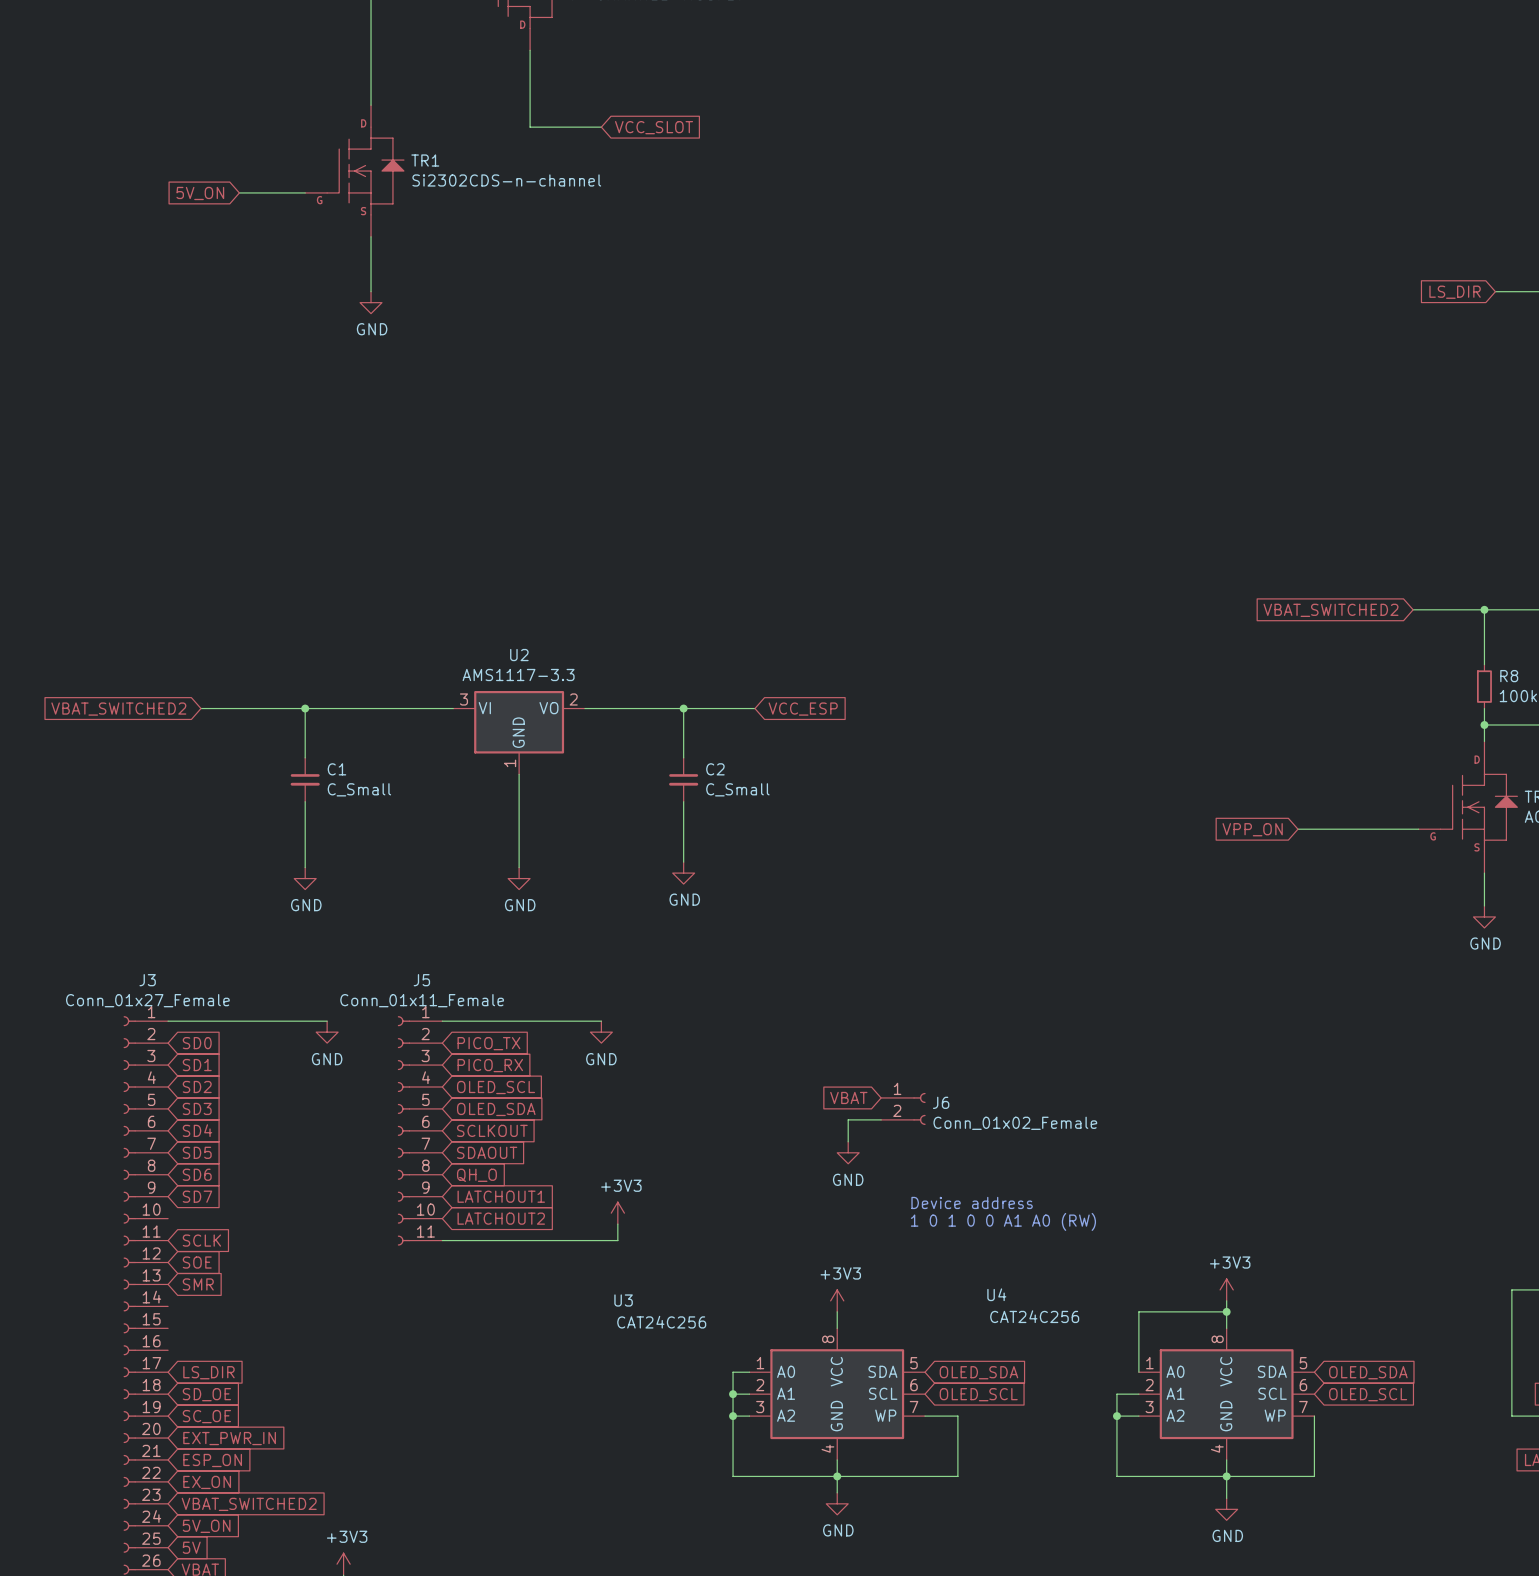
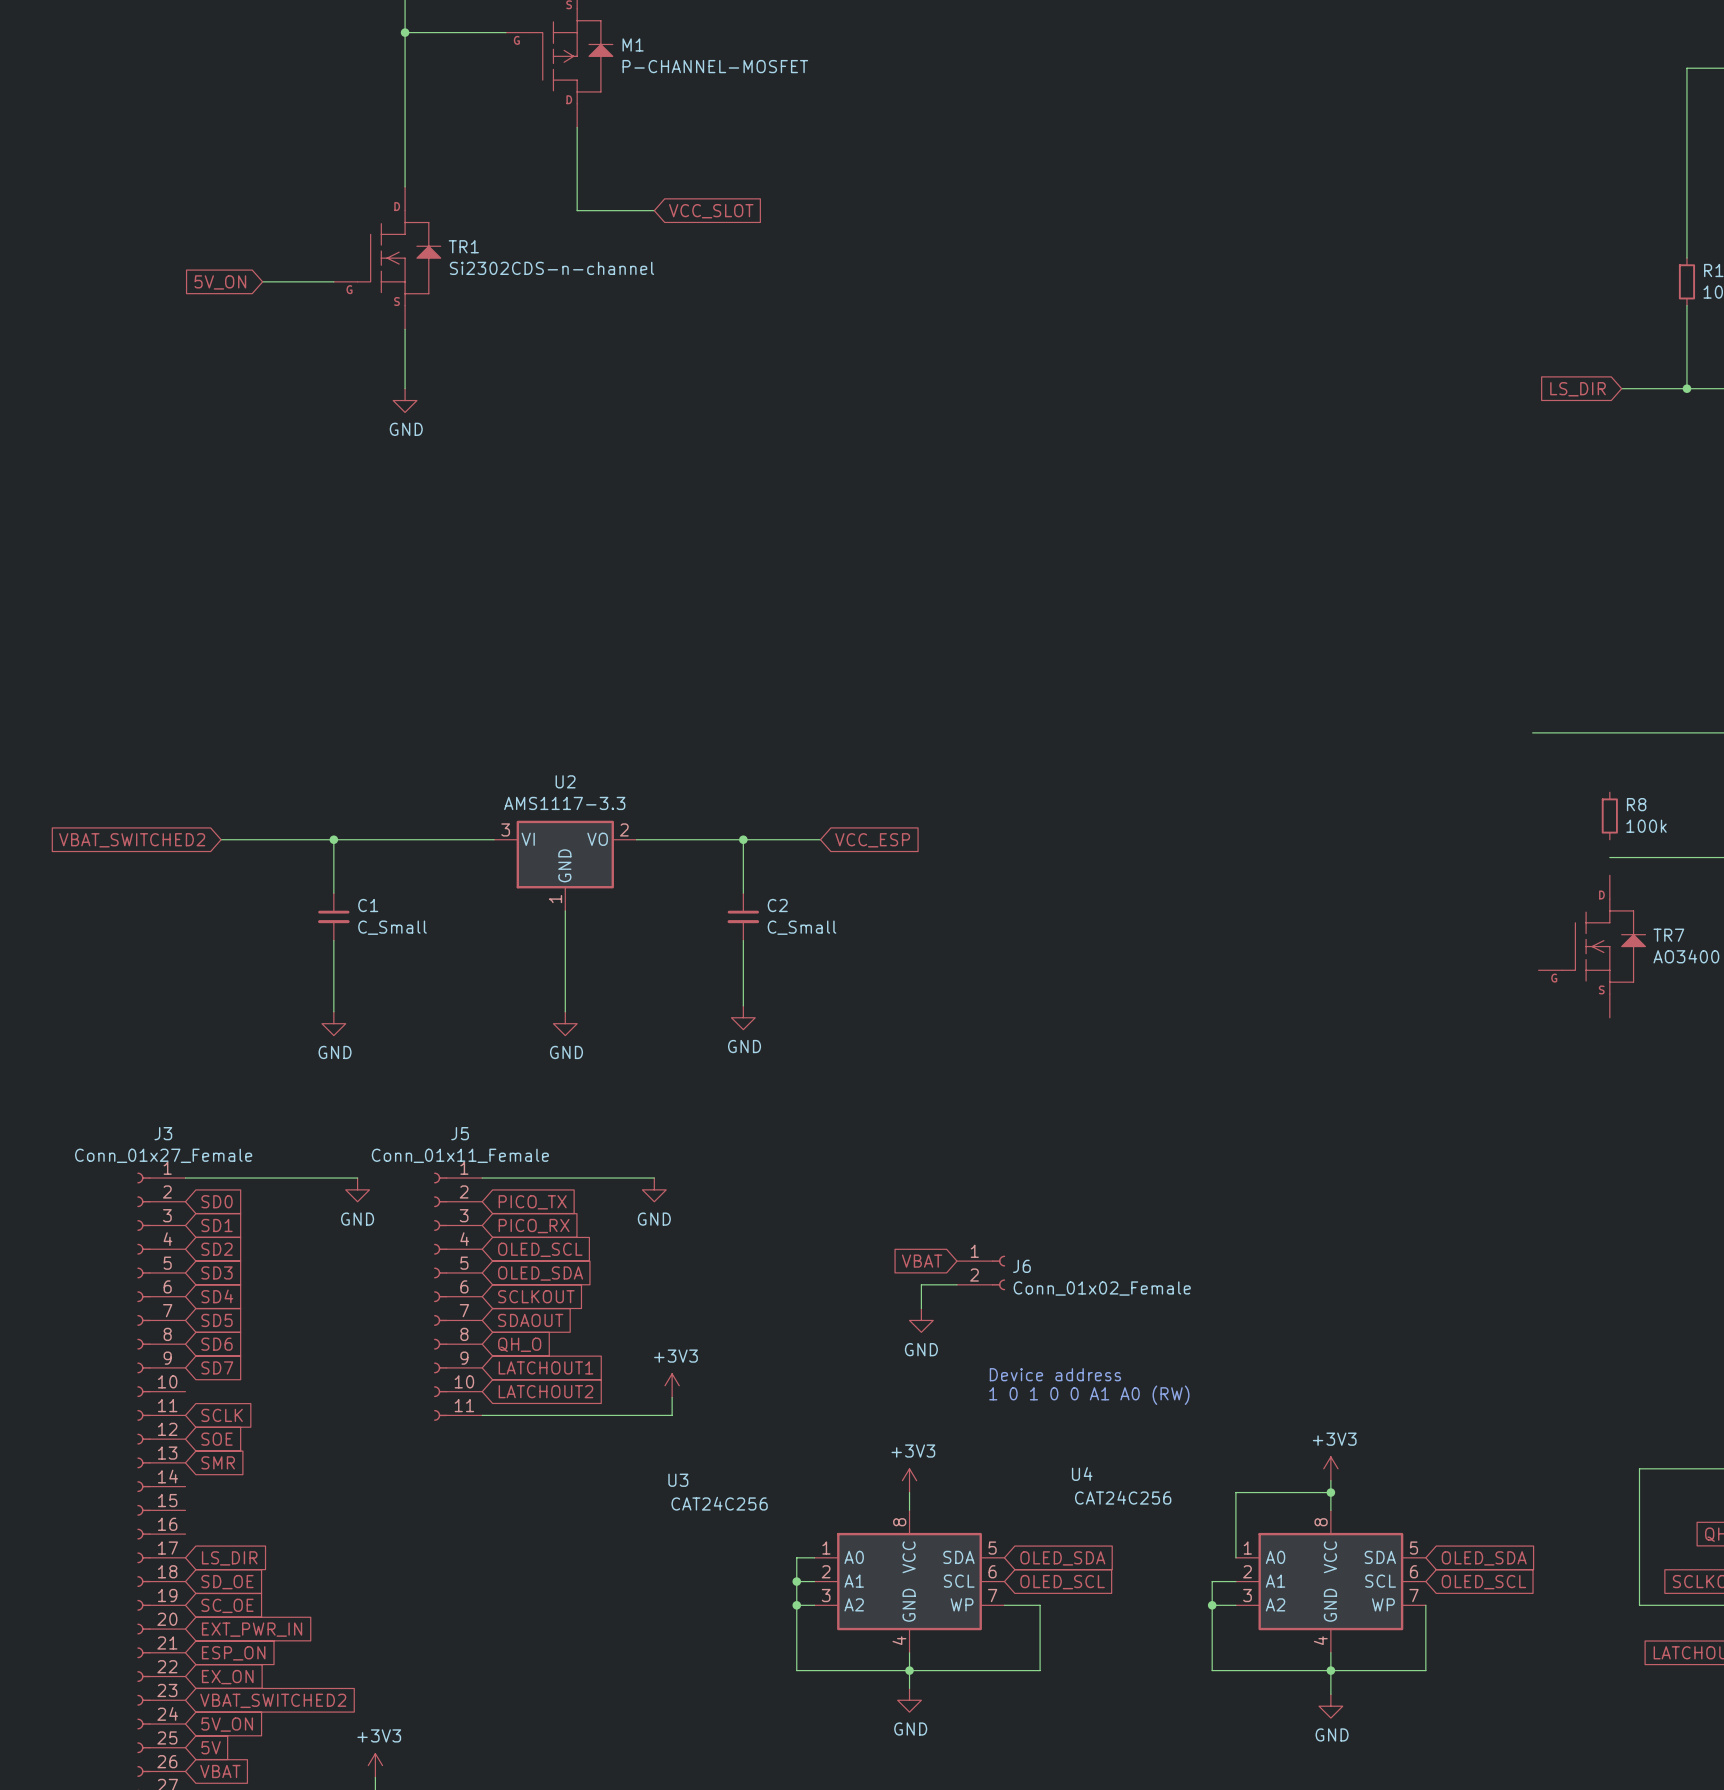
wire: (1484, 609) (1484, 664) -> none
junction: (1484, 609) -> none
global label: VBAT_SWITCHED2 (1330, 610) -> none
wire: (1484, 708) (1484, 741) -> none
junction: (1484, 724) -> none
global label: VPP_ON (1252, 829) -> none
wire: (1297, 829) (1418, 829) -> none
wire: (1484, 873) (1484, 905) -> none
power symbol: GND (1484, 916) -> none

